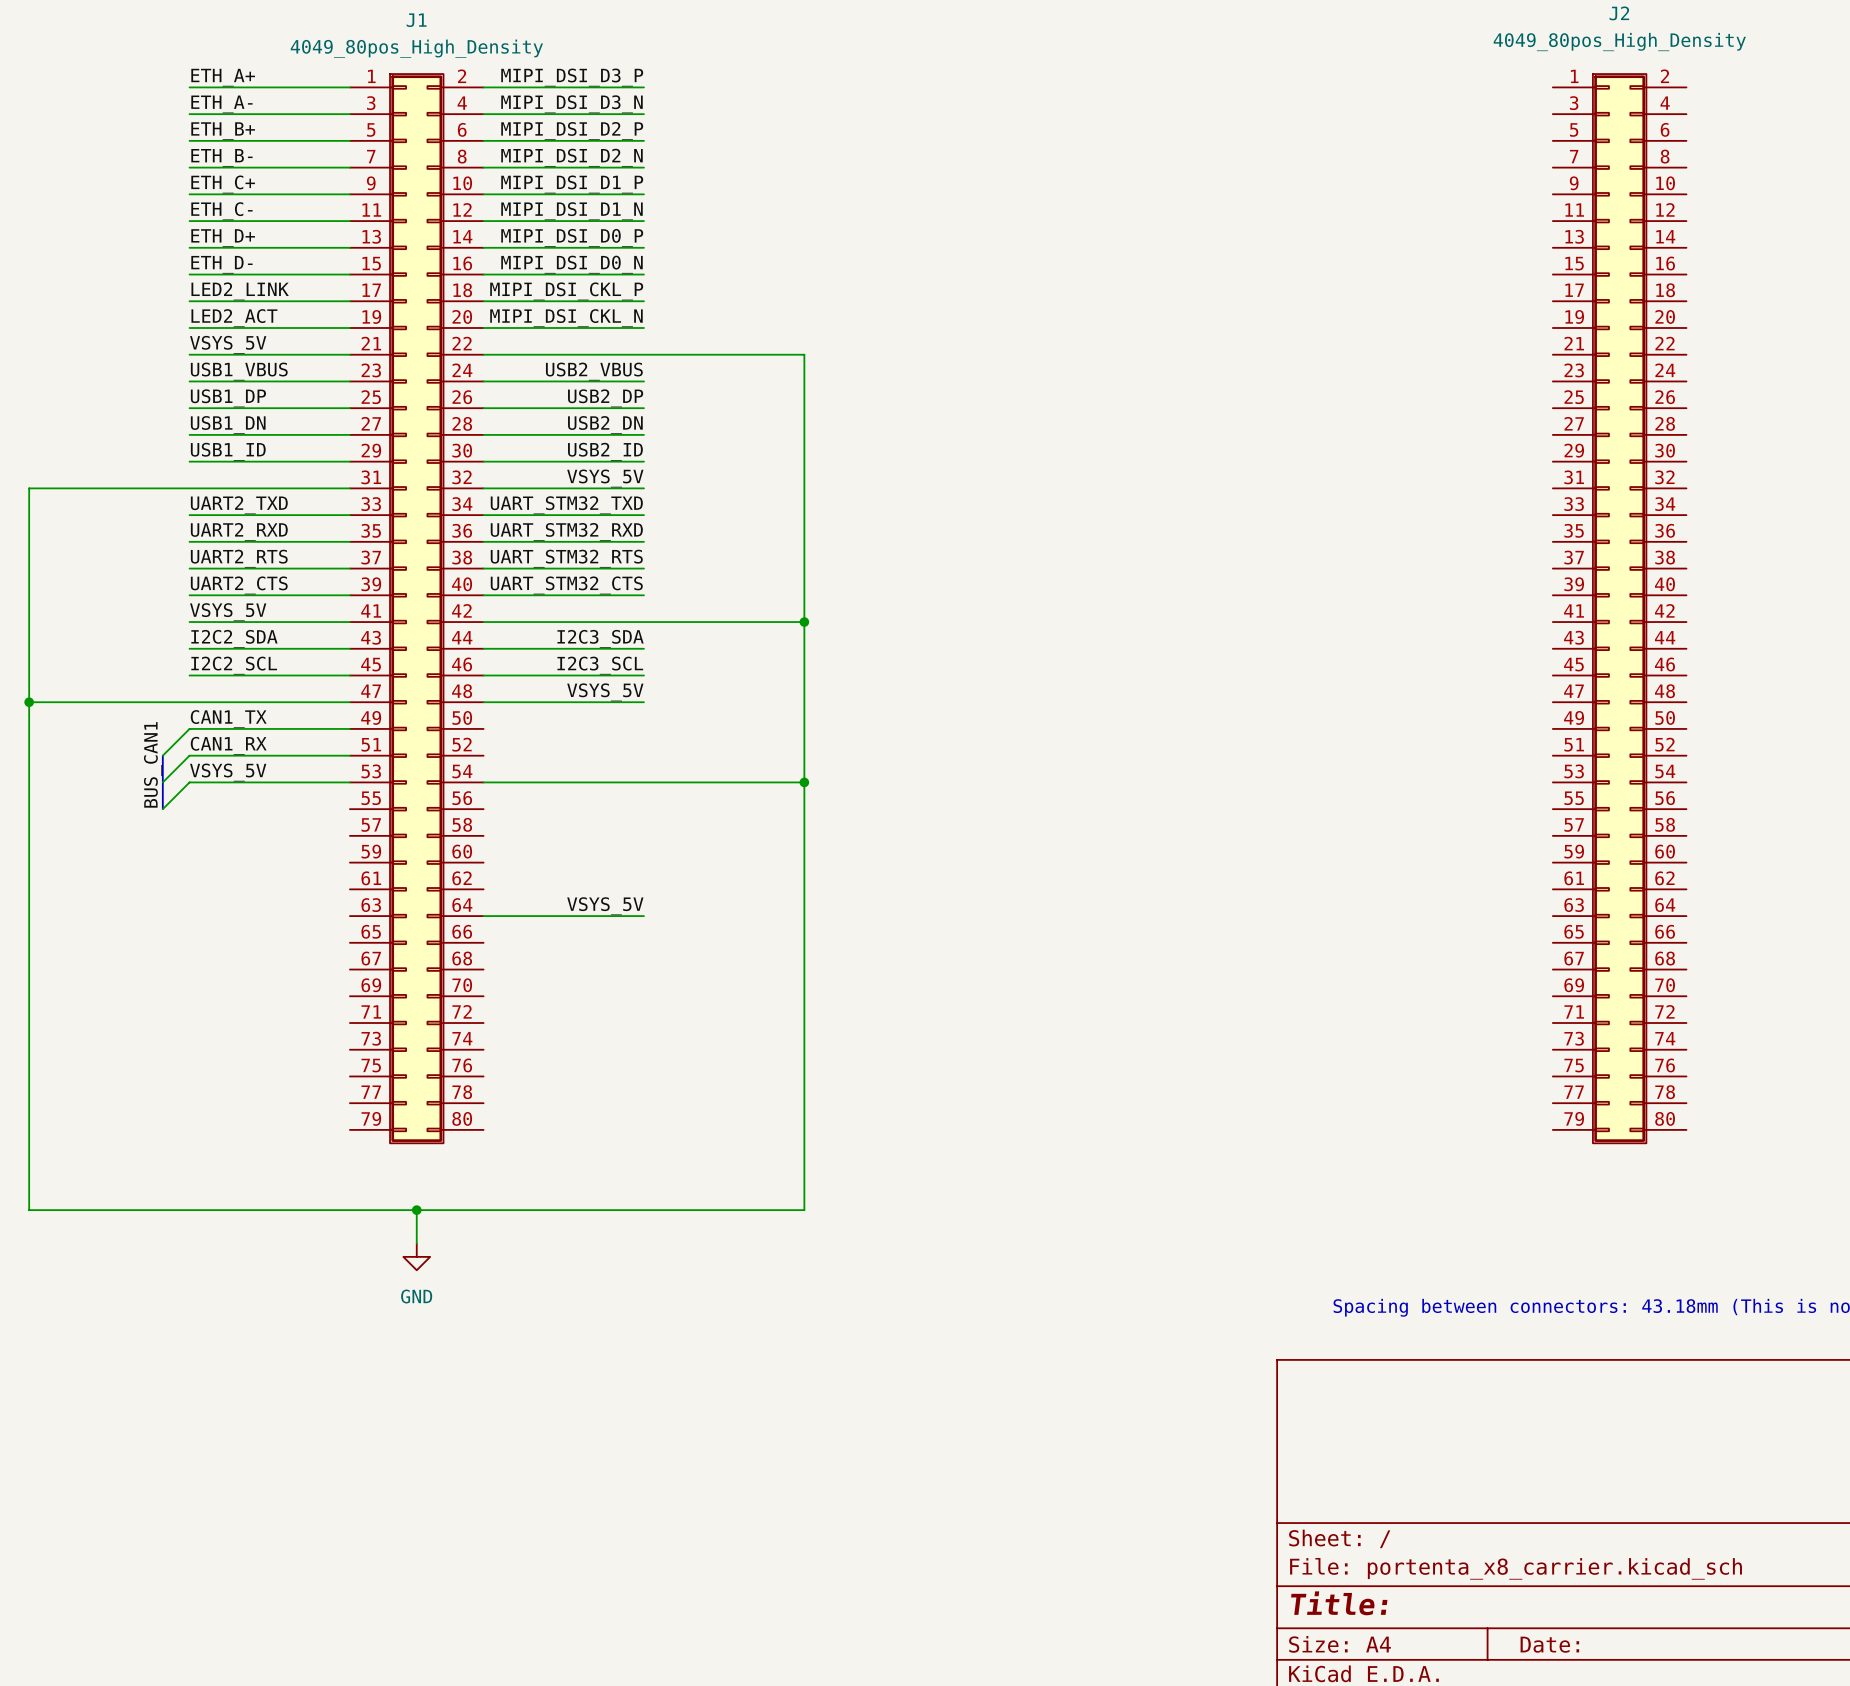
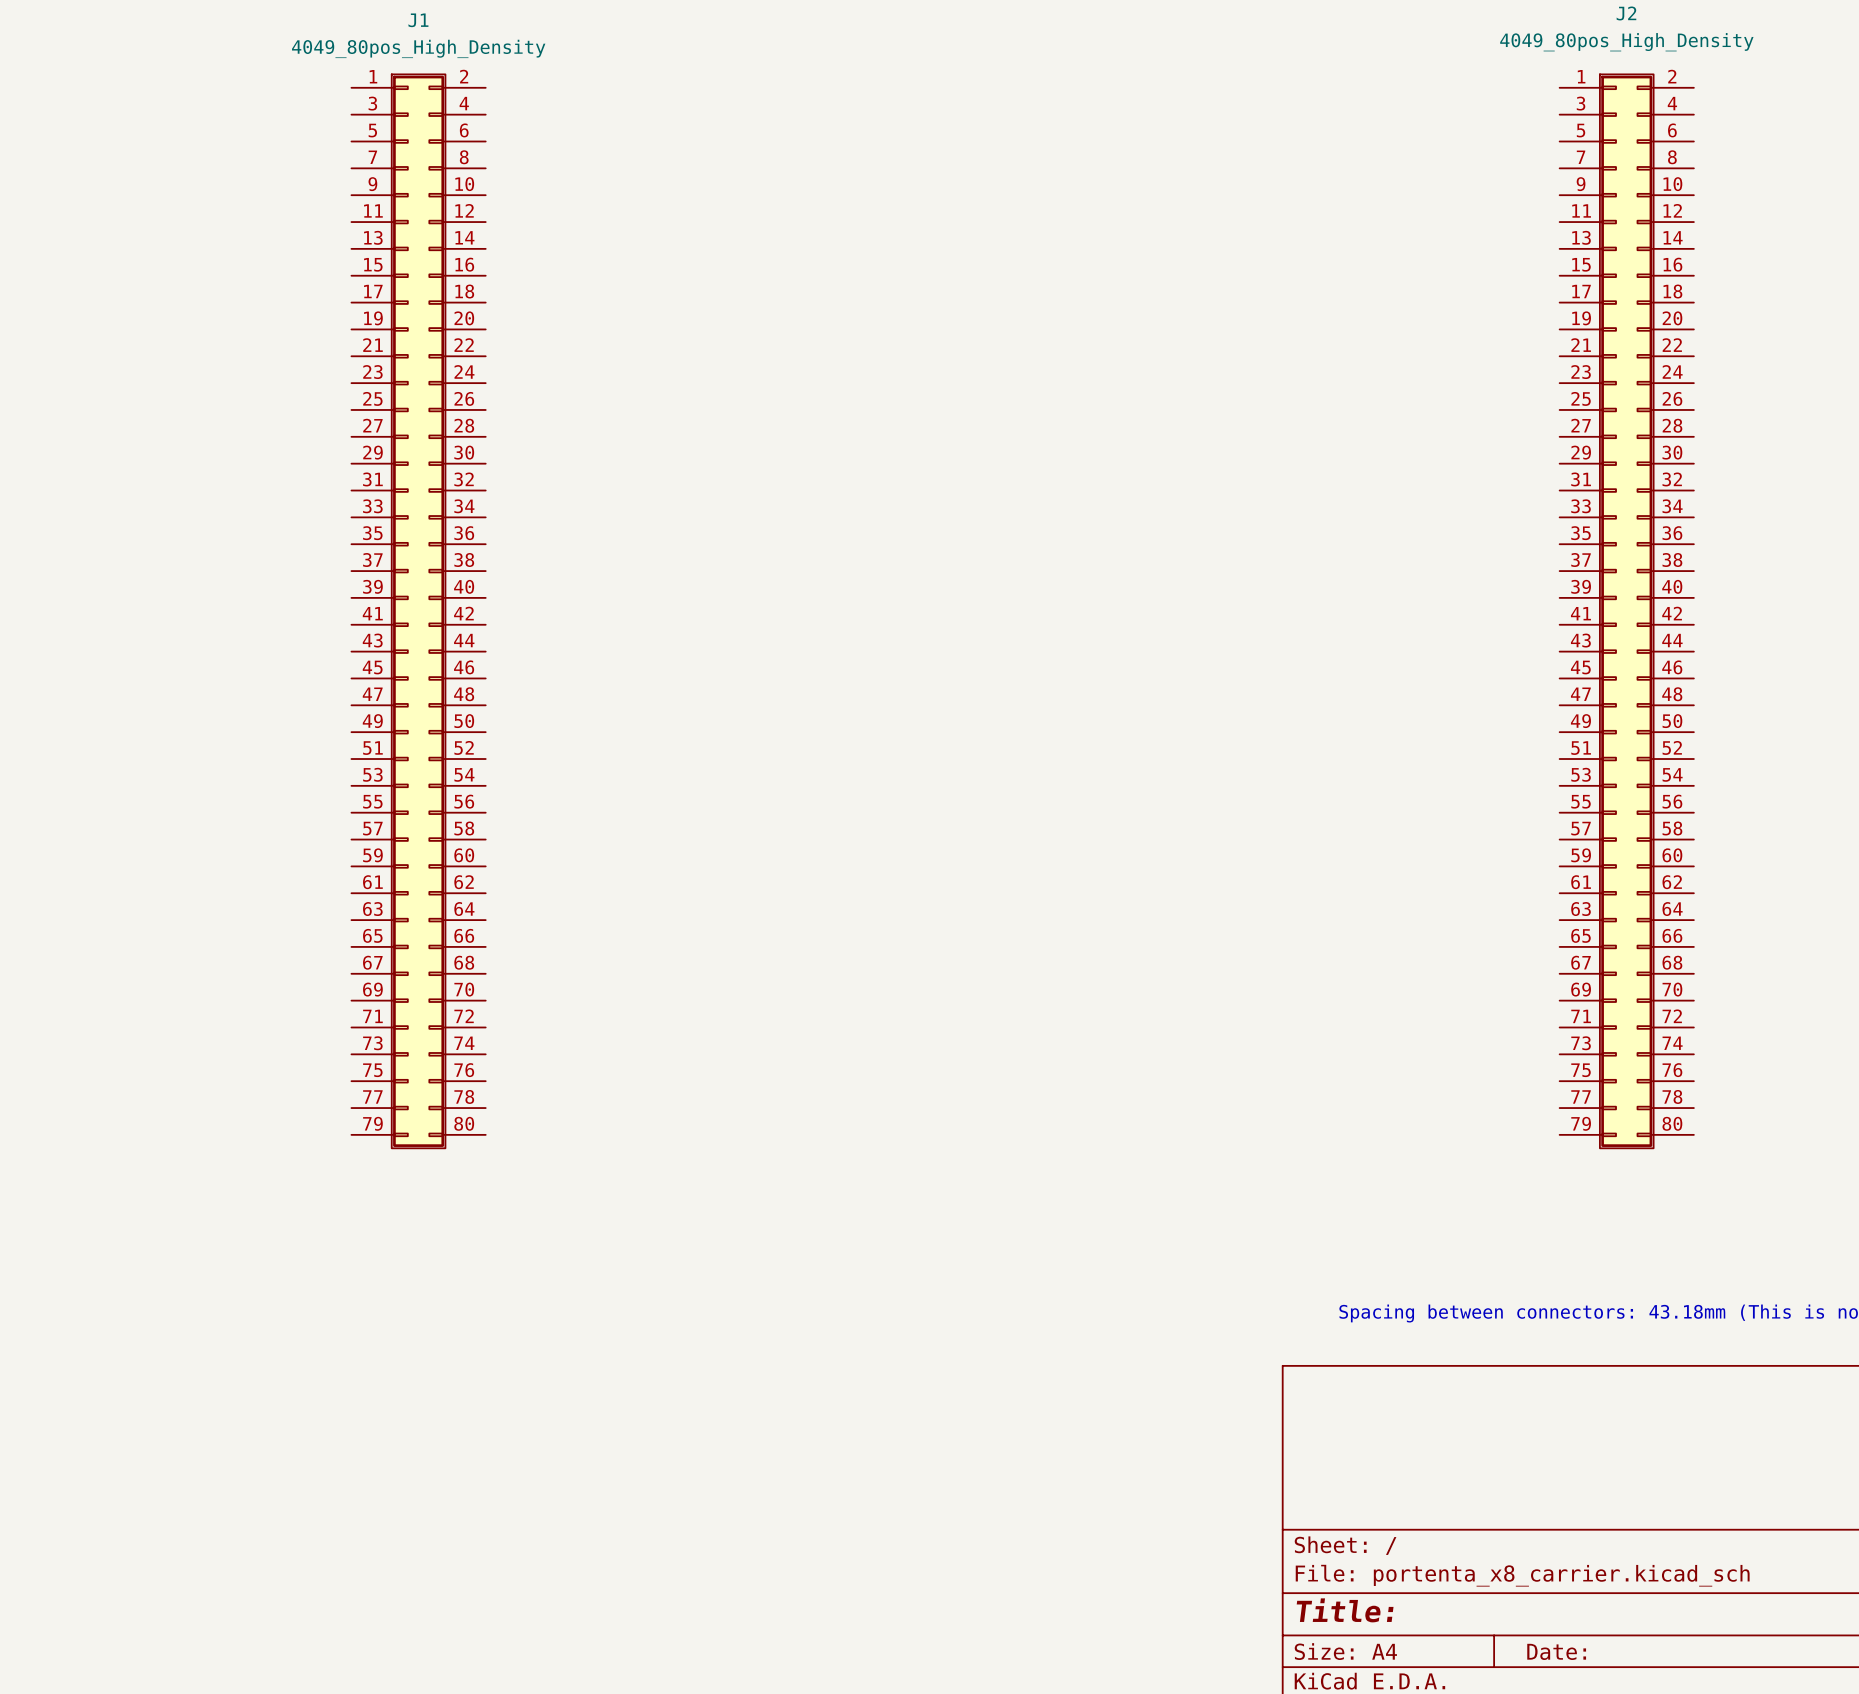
label: ETH_A+ (223, 77) -> none
label: MIPI_DSI_D3_P (572, 77) -> none
wire: (189, 87) (349, 87) -> none
wire: (483, 87) (643, 87) -> none
label: ETH_A- (221, 104) -> none
label: MIPI_DSI_D3_N (571, 104) -> none
wire: (189, 114) (349, 114) -> none
wire: (483, 114) (643, 114) -> none
label: MIPI_DSI_D2_P (572, 130) -> none
label: ETH_B+ (223, 131) -> none
wire: (189, 140) (349, 140) -> none
wire: (483, 140) (643, 140) -> none
label: ETH_B- (221, 157) -> none
label: MIPI_DSI_D2_N (571, 157) -> none
wire: (189, 167) (349, 167) -> none
wire: (483, 167) (643, 167) -> none
label: ETH_C+ (223, 184) -> none
label: MIPI_DSI_D1_P (572, 184) -> none
wire: (189, 194) (349, 194) -> none
wire: (483, 194) (643, 194) -> none
label: ETH_C- (221, 211) -> none
label: MIPI_DSI_D1_N (571, 211) -> none
wire: (189, 221) (349, 221) -> none
wire: (483, 221) (643, 221) -> none
label: MIPI_DSI_D0_P (572, 237) -> none
label: ETH_D+ (223, 238) -> none
wire: (189, 247) (349, 247) -> none
wire: (483, 247) (643, 247) -> none
label: ETH_D- (221, 264) -> none
label: MIPI_DSI_D0_N (571, 264) -> none
wire: (189, 274) (349, 274) -> none
wire: (483, 274) (643, 274) -> none
label: LED2_LINK (240, 291) -> none
label: MIPI_DSI_CKL_P (566, 291) -> none
wire: (189, 301) (349, 301) -> none
wire: (483, 301) (643, 301) -> none
label: LED2_ACT (234, 318) -> none
label: MIPI_DSI_CKL_N (566, 318) -> none
wire: (189, 327) (349, 327) -> none
wire: (483, 327) (643, 327) -> none
label: VSYS_5V (228, 344) -> none
wire: (189, 354) (349, 354) -> none
wire: (483, 354) (804, 354) (804, 1210) (29, 1210) (29, 488) (349, 488) -> none
label: USB1_VBUS (239, 371) -> none
label: USB2_VBUS (594, 371) -> none
wire: (189, 381) (349, 381) -> none
wire: (483, 381) (643, 381) -> none
label: USB1_DP (228, 398) -> none
label: USB2_DP (605, 398) -> none
wire: (189, 408) (349, 408) -> none
wire: (483, 408) (643, 408) -> none
label: USB1_DN (228, 425) -> none
label: USB2_DN (605, 425) -> none
wire: (189, 434) (349, 434) -> none
wire: (483, 434) (643, 434) -> none
label: USB1_ID (228, 451) -> none
label: USB2_ID (605, 451) -> none
wire: (189, 461) (349, 461) -> none
wire: (483, 461) (643, 461) -> none
label: VSYS_5V (605, 478) -> none
wire: (483, 488) (643, 488) -> none
label: UART2_TXD (239, 505) -> none
label: UART_STM32_TXD (566, 505) -> none
wire: (189, 515) (349, 515) -> none
wire: (483, 515) (643, 515) -> none
label: UART2_RXD (239, 531) -> none
label: UART_STM32_RXD (566, 531) -> none
wire: (189, 541) (349, 541) -> none
wire: (483, 541) (643, 541) -> none
label: UART2_RTS (239, 558) -> none
label: UART_STM32_RTS (566, 558) -> none
wire: (189, 568) (349, 568) -> none
wire: (483, 568) (643, 568) -> none
label: UART2_CTS (239, 585) -> none
label: UART_STM32_CTS (566, 585) -> none
wire: (189, 595) (349, 595) -> none
wire: (483, 595) (643, 595) -> none
label: VSYS_5V (228, 612) -> none
wire: (189, 622) (349, 622) -> none
wire: (483, 622) (804, 622) -> none
junction: (804, 622) -> none
label: I2C2_SDA (234, 638) -> none
label: I2C3_SDA (600, 638) -> none
wire: (189, 648) (349, 648) -> none
wire: (483, 648) (643, 648) -> none
label: I2C2_SCL (234, 665) -> none
label: I2C3_SCL (600, 665) -> none
wire: (189, 675) (349, 675) -> none
wire: (483, 675) (643, 675) -> none
label: VSYS_5V (605, 692) -> none
wire: (29, 702) (349, 702) -> none
junction: (29, 702) -> none
wire: (483, 702) (643, 702) -> none
label: CAN1_TX (228, 719) -> none
wire: (349, 728) (189, 728) (162, 755) -> none
label: CAN1_RX (228, 745) -> none
bus: (162, 755) (162, 809) -> none
wire: (349, 755) (189, 755) (162, 782) -> none
label: BUS_CAN1 (152, 764) -> none
label: VSYS_5V (228, 772) -> none
wire: (349, 782) (189, 782) (162, 809) -> none
wire: (483, 782) (804, 782) -> none
junction: (804, 782) -> none
label: VSYS_5V (605, 906) -> none
wire: (483, 916) (643, 916) -> none
wire: (416, 1210) (416, 1243) -> none
junction: (416, 1210) -> none
power symbol: GND (416, 1256) -> none

